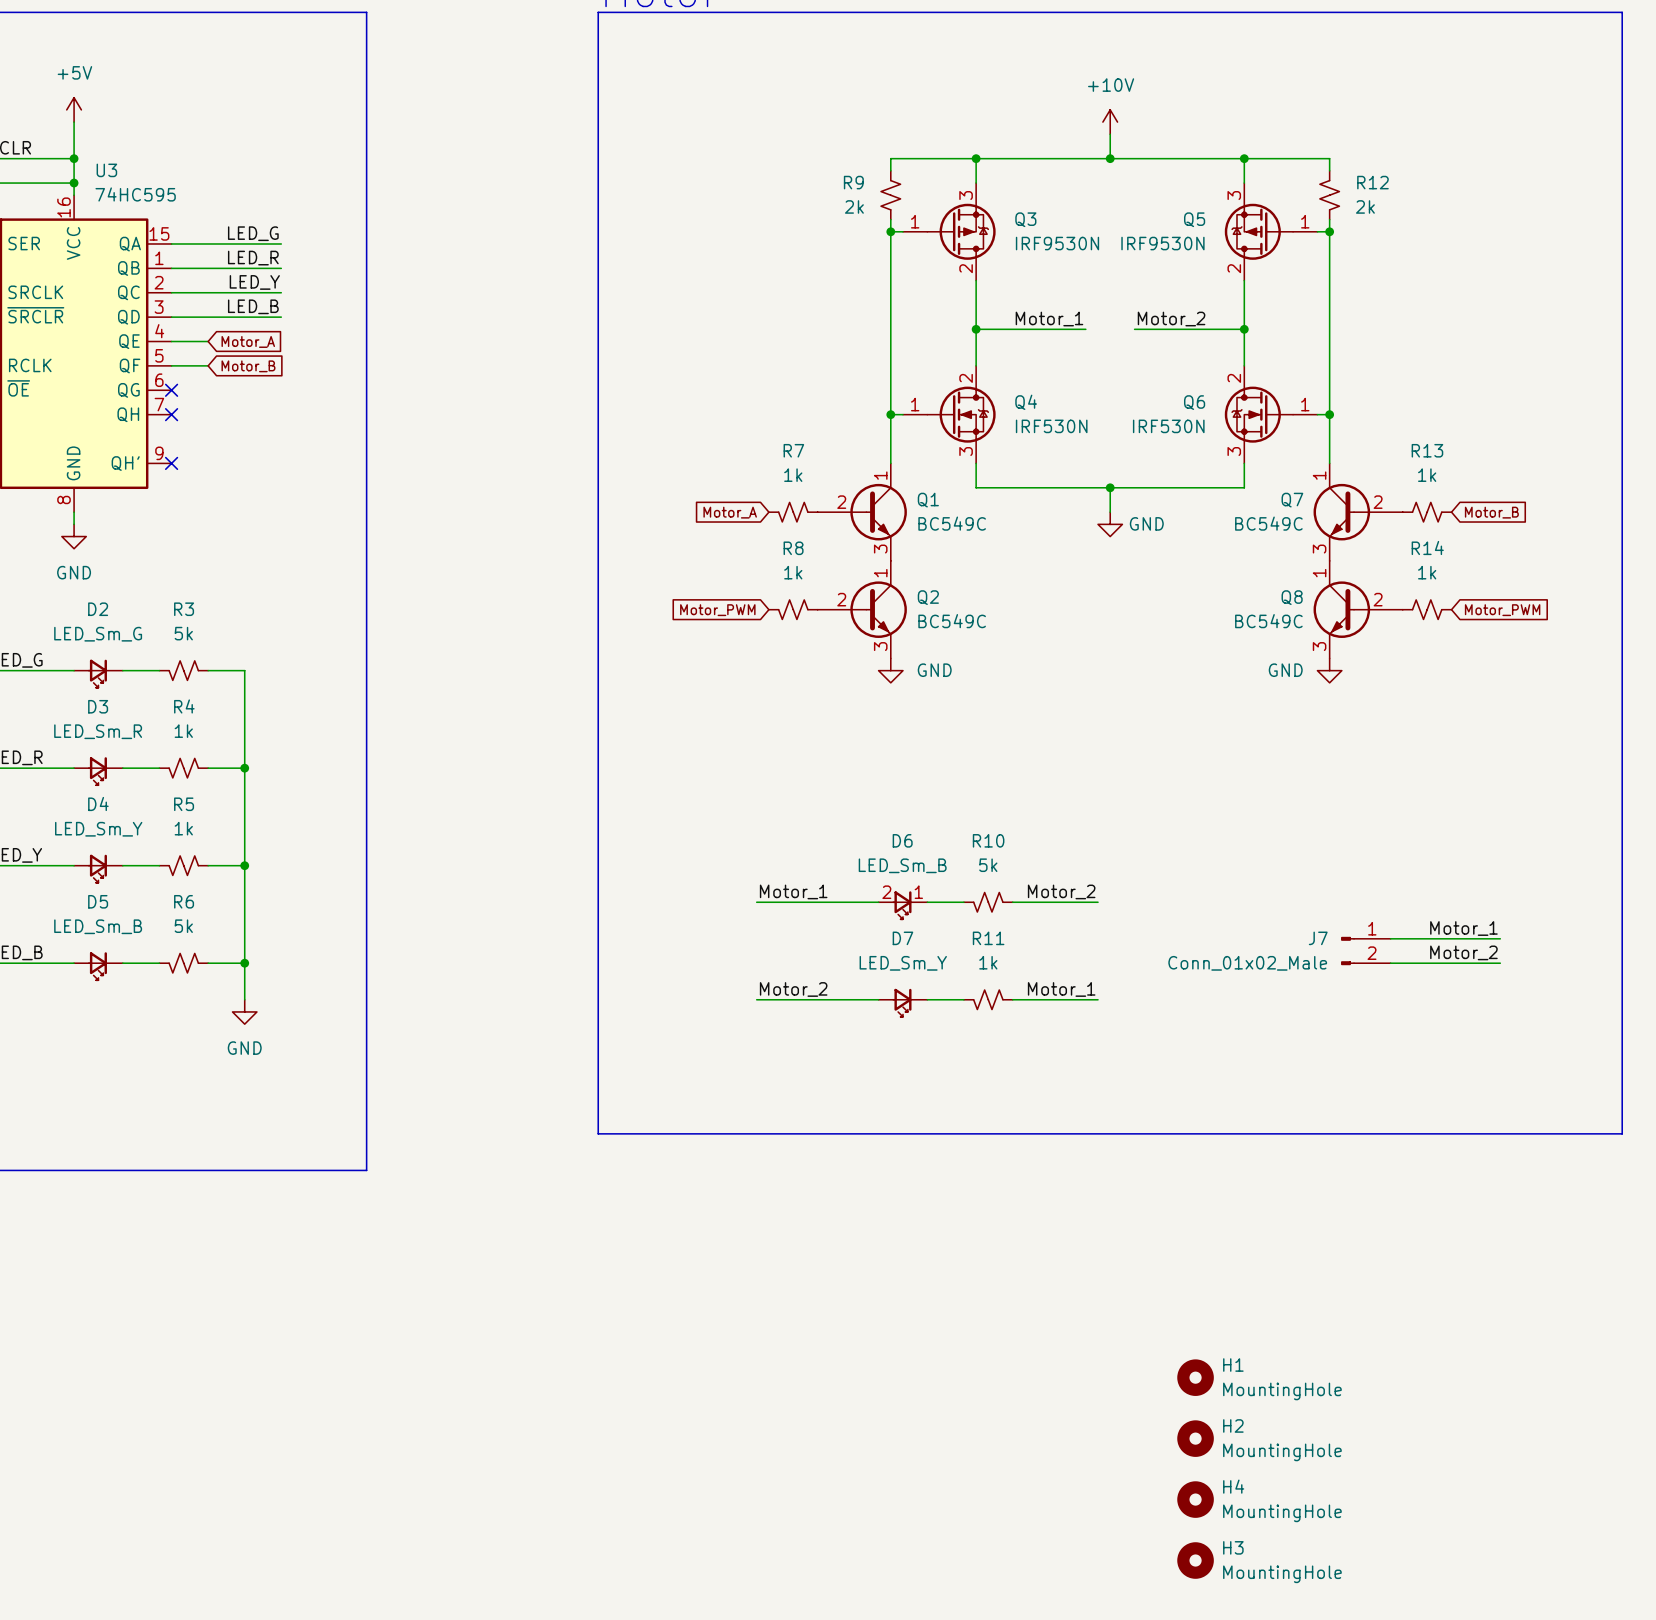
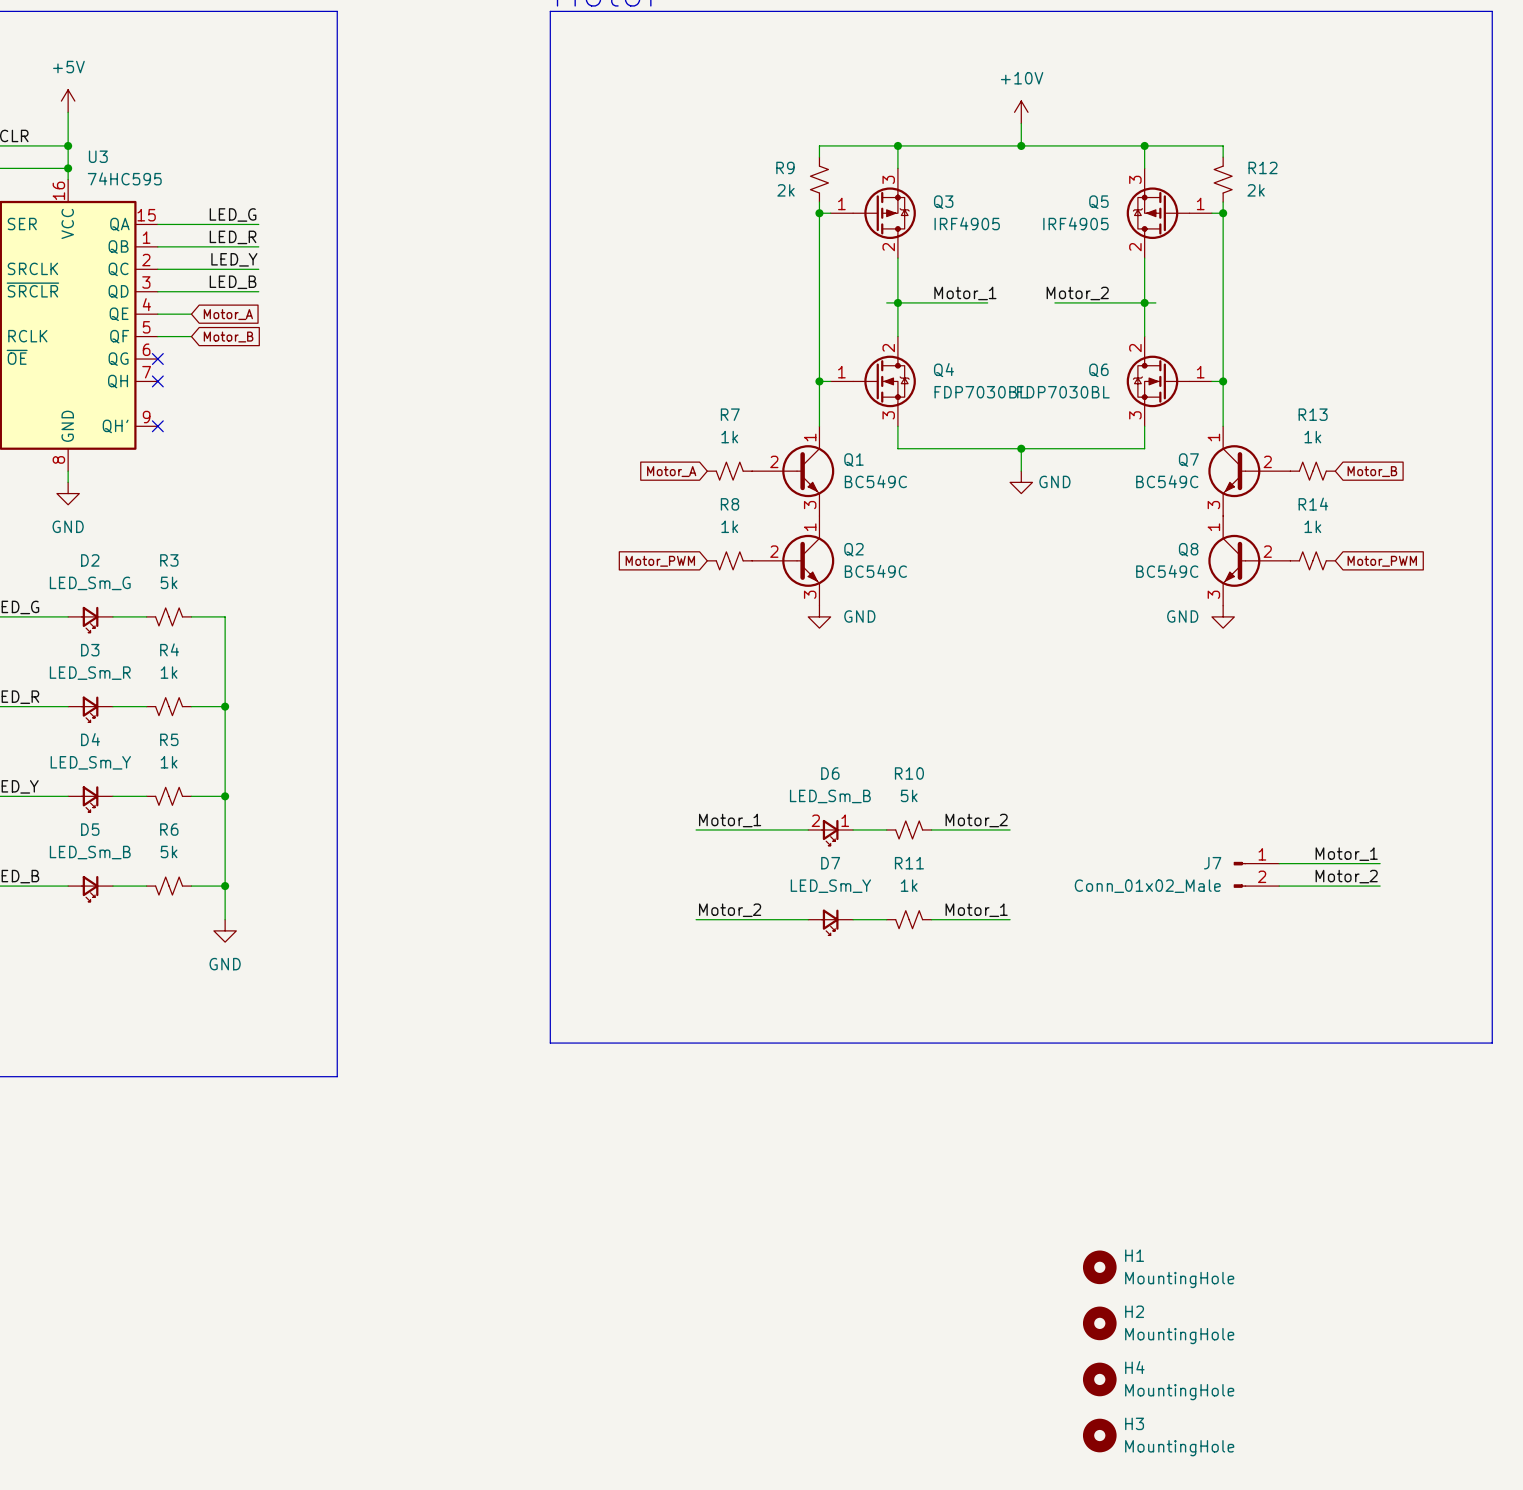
Q3 value: IRF9530N (1057, 243) -> IRF4905 (967, 223)
Q5 value: IRF9530N (1162, 243) -> IRF4905 (1075, 223)
wire: (1073, 329) (1085, 329) -> (886, 302) (897, 302)
wire: (1134, 329) (1146, 329) -> (1144, 302) (1155, 302)
Q4 value: IRF530N (1051, 426) -> FDP7030BL (980, 392)
Q6 value: IRF530N (1168, 426) -> FDP7030BL (1063, 392)

